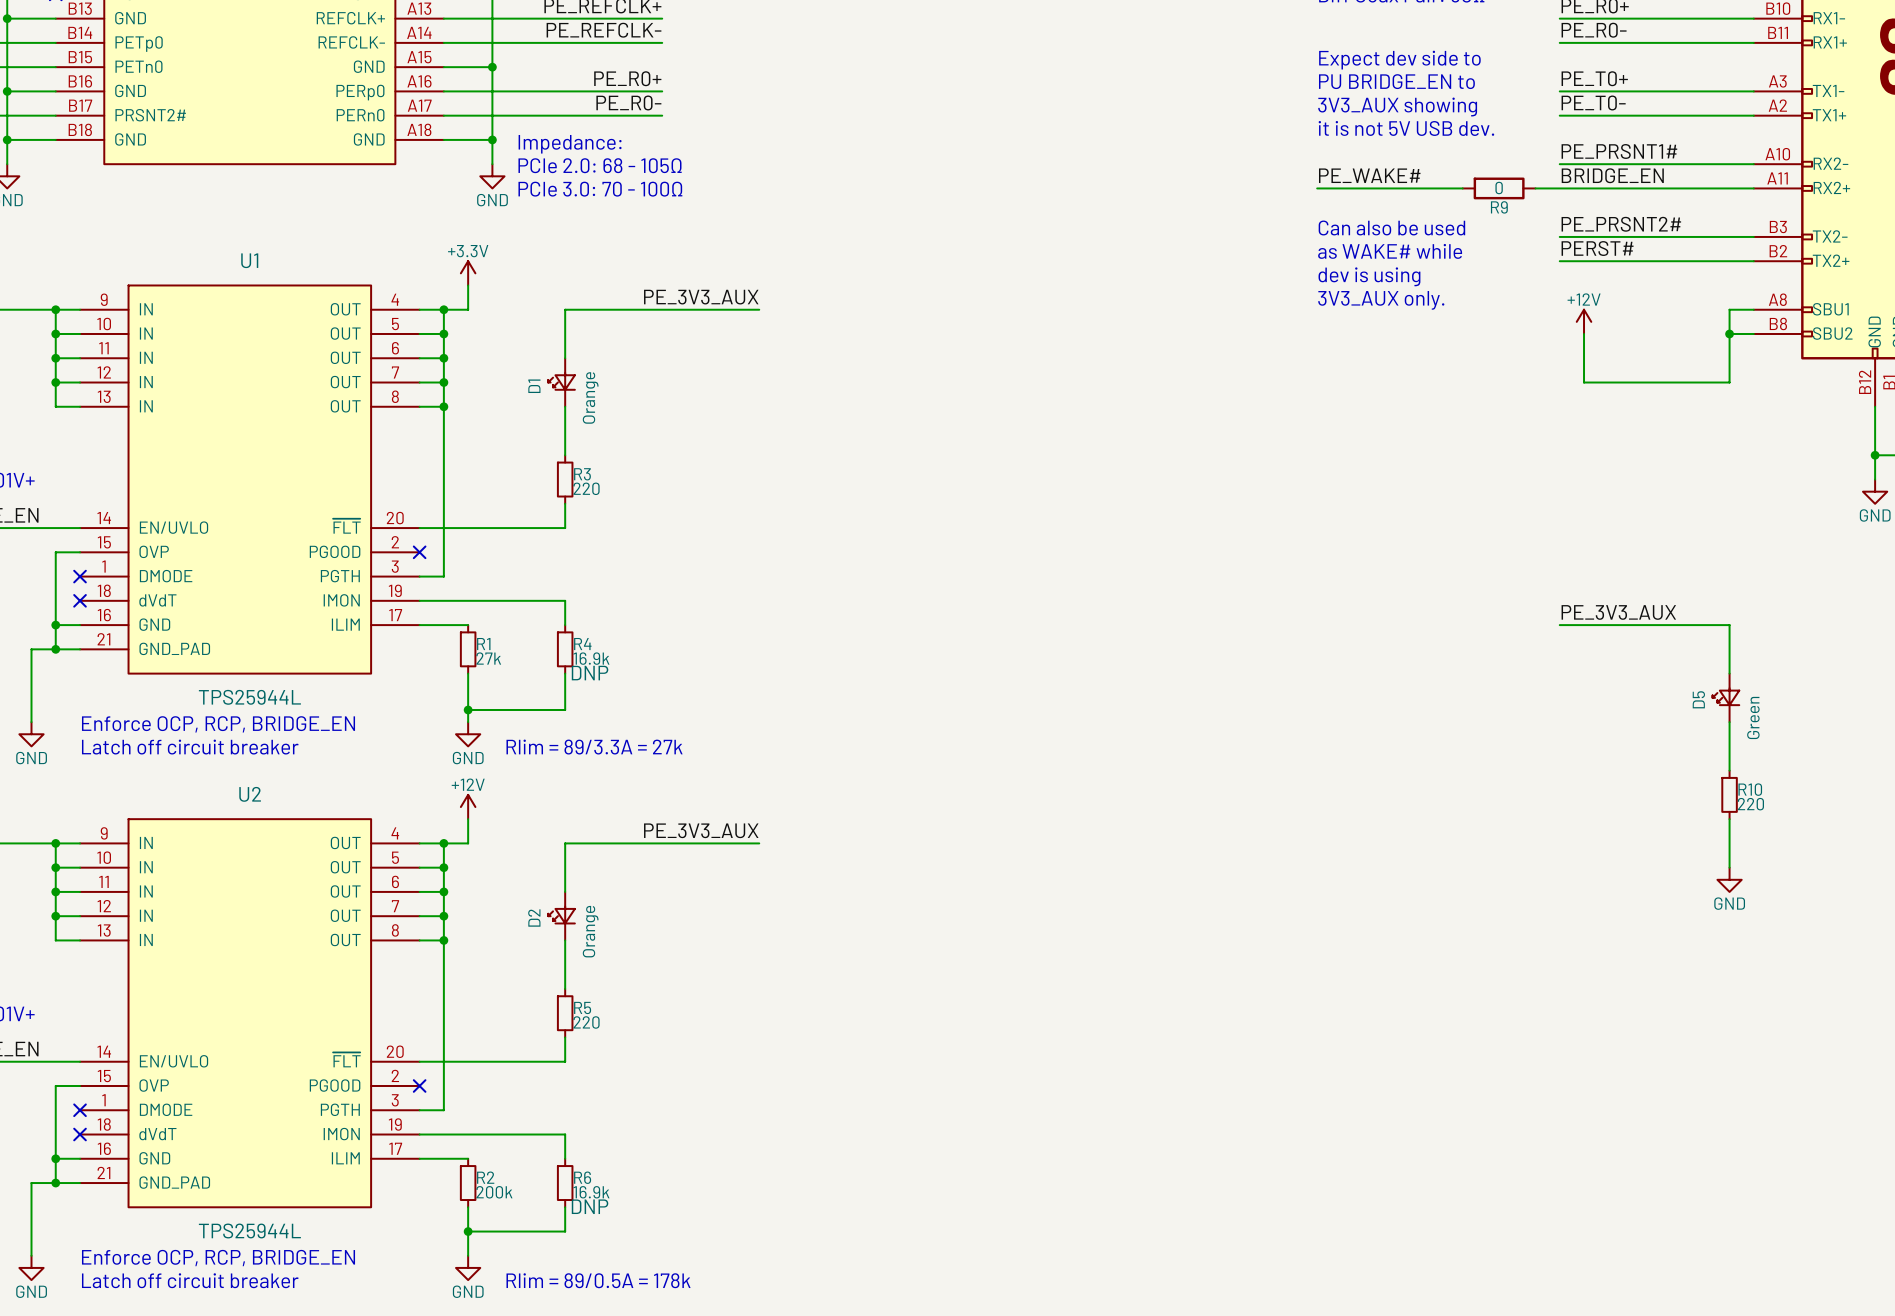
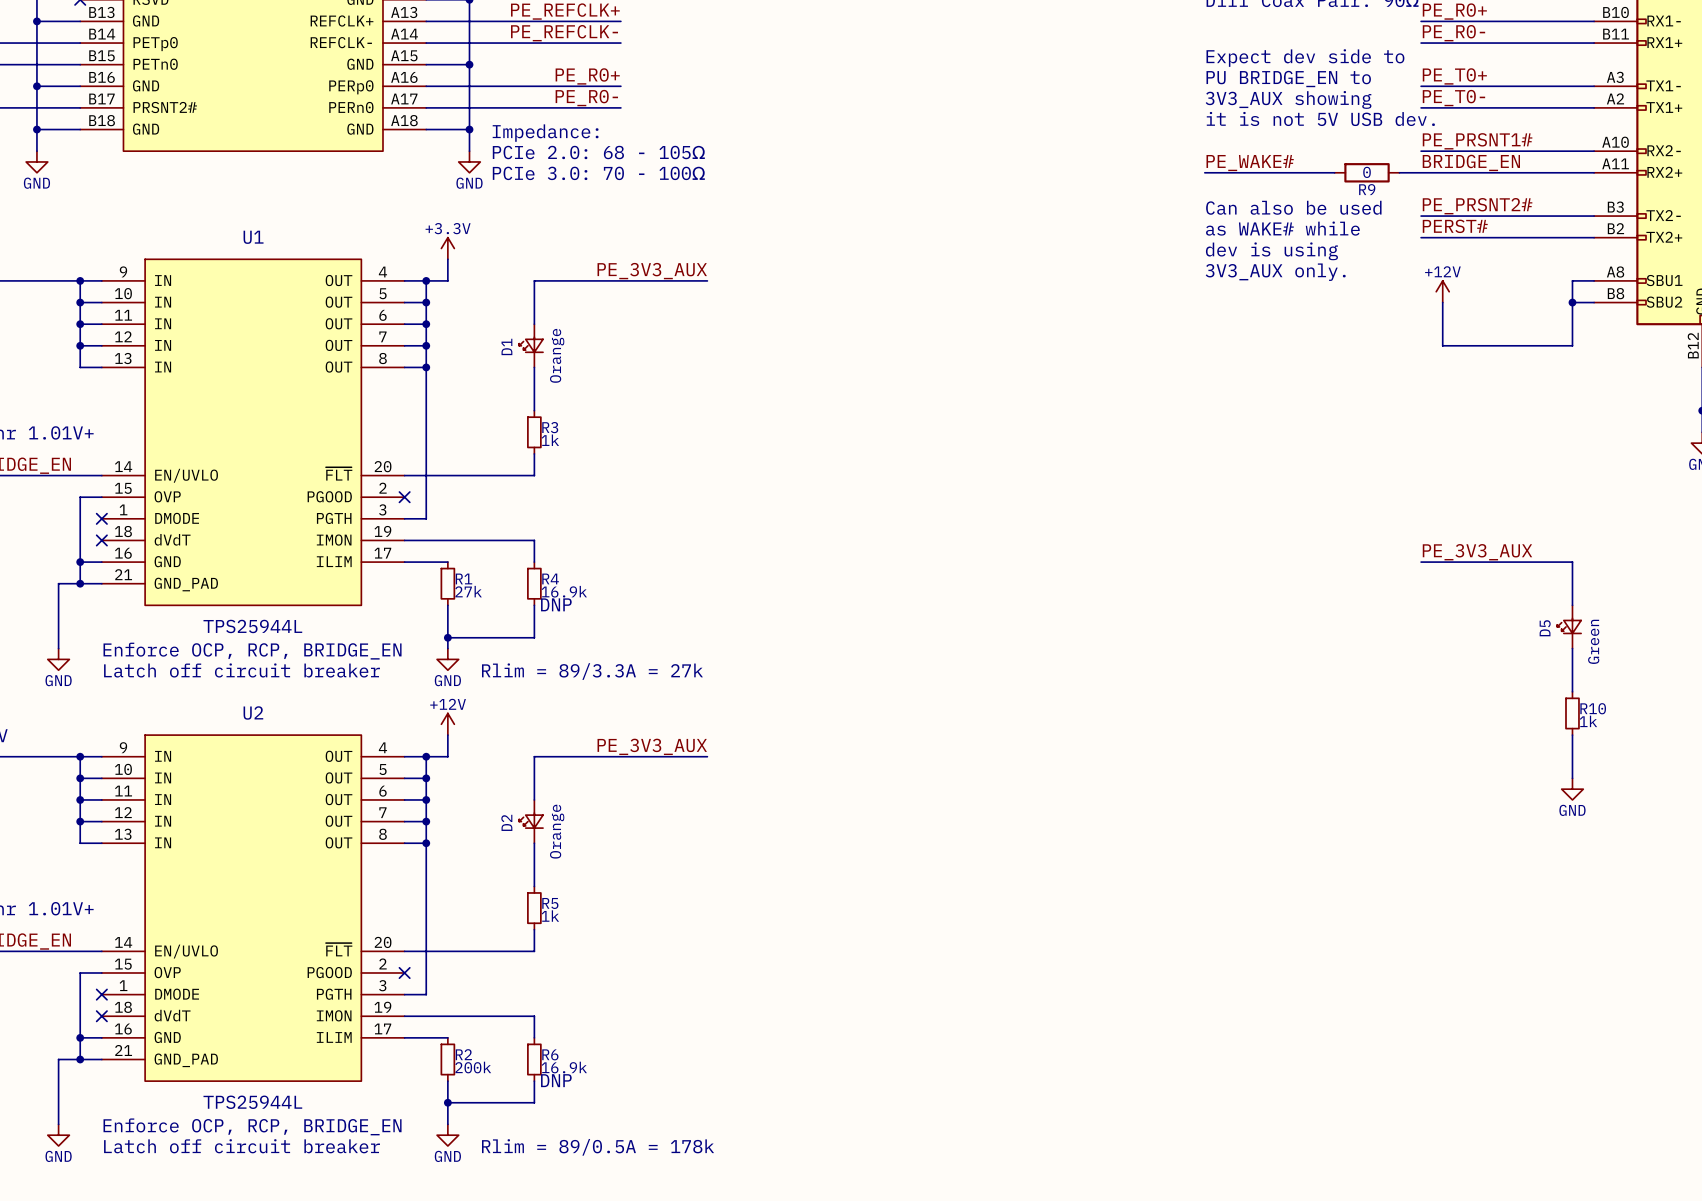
R3 value: 220 (586, 488) -> 1k (550, 440)
R10 value: 220 (1750, 804) -> 1k (1588, 721)
R5 value: 220 (586, 1022) -> 1k (550, 916)

